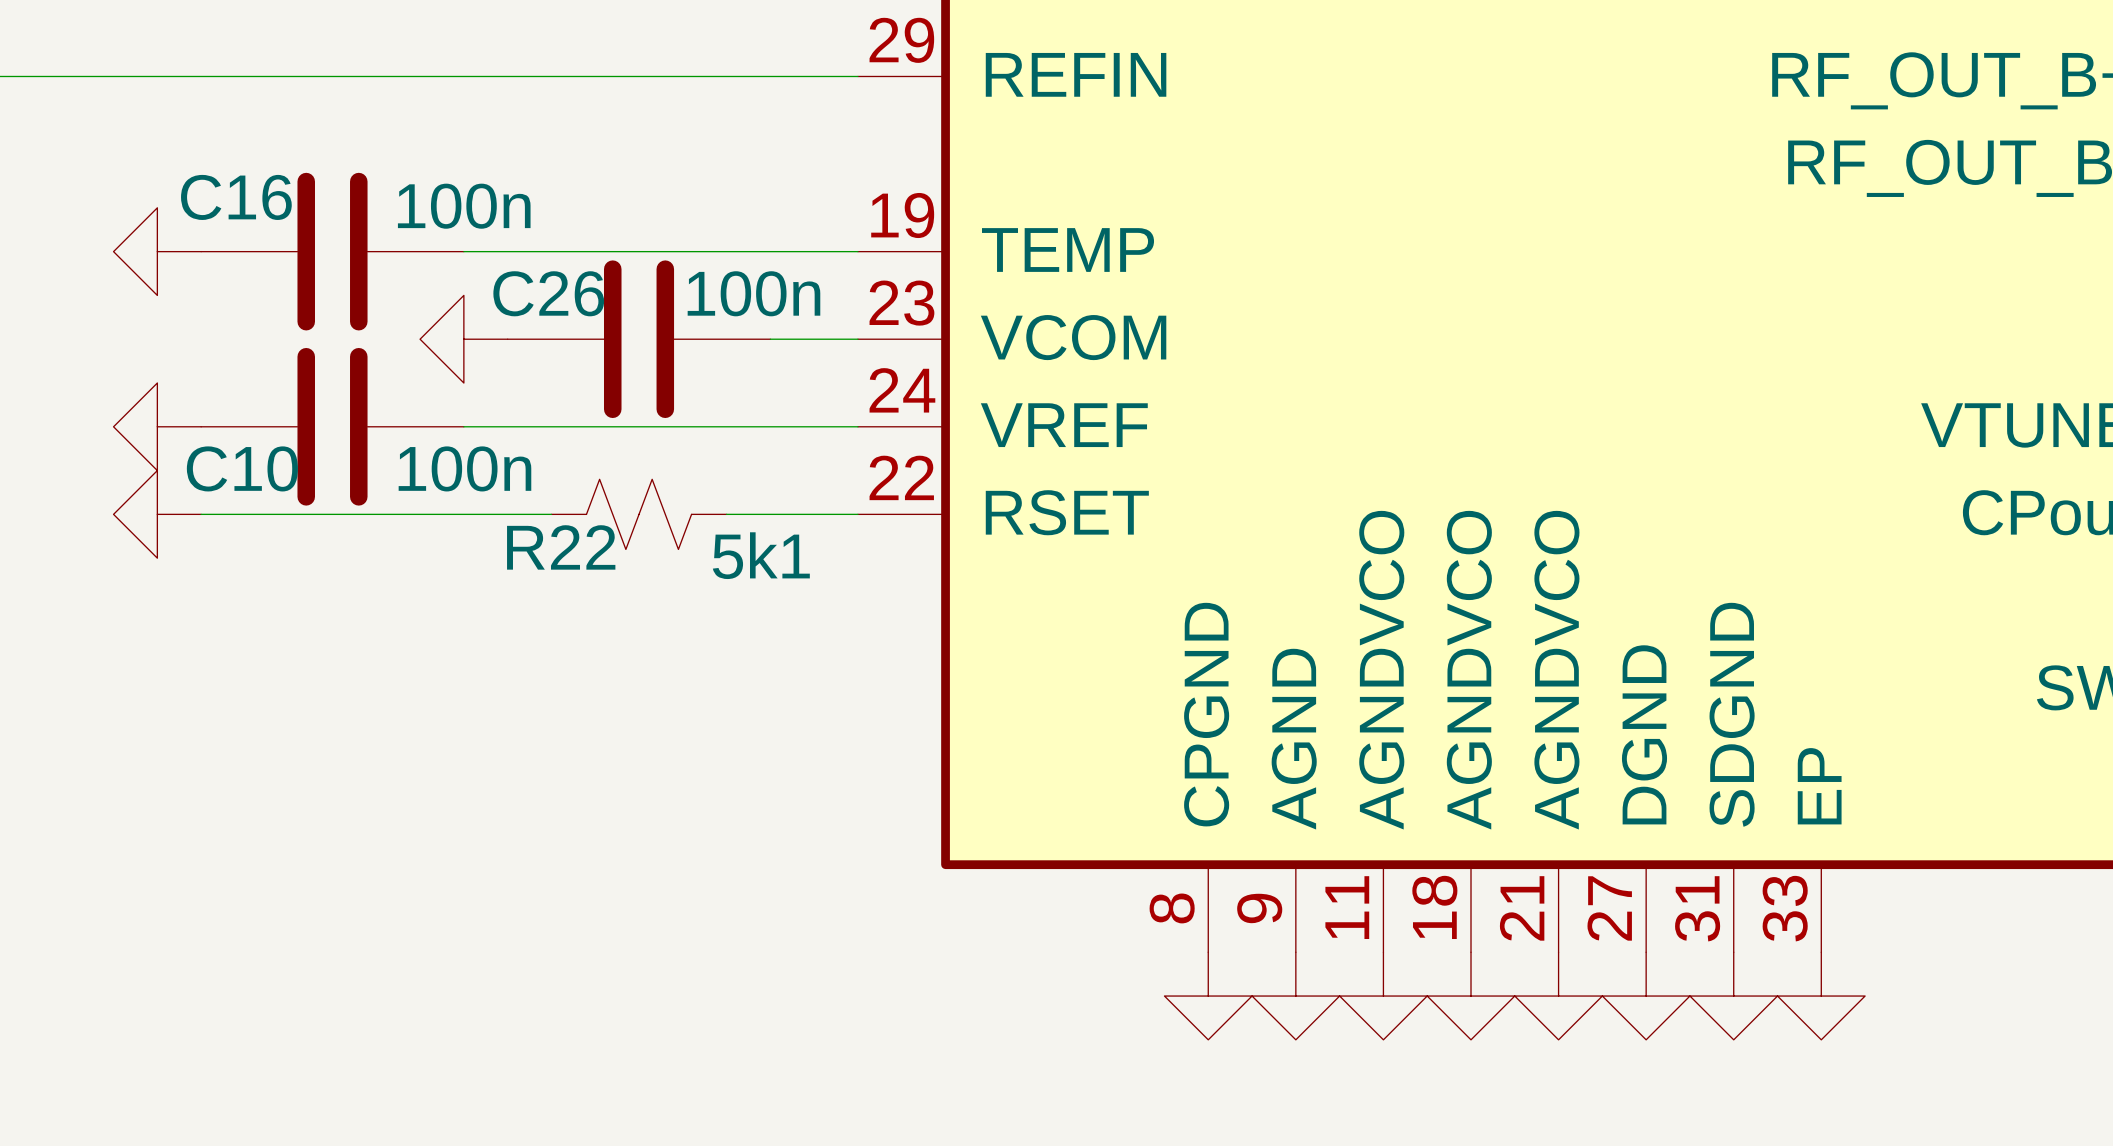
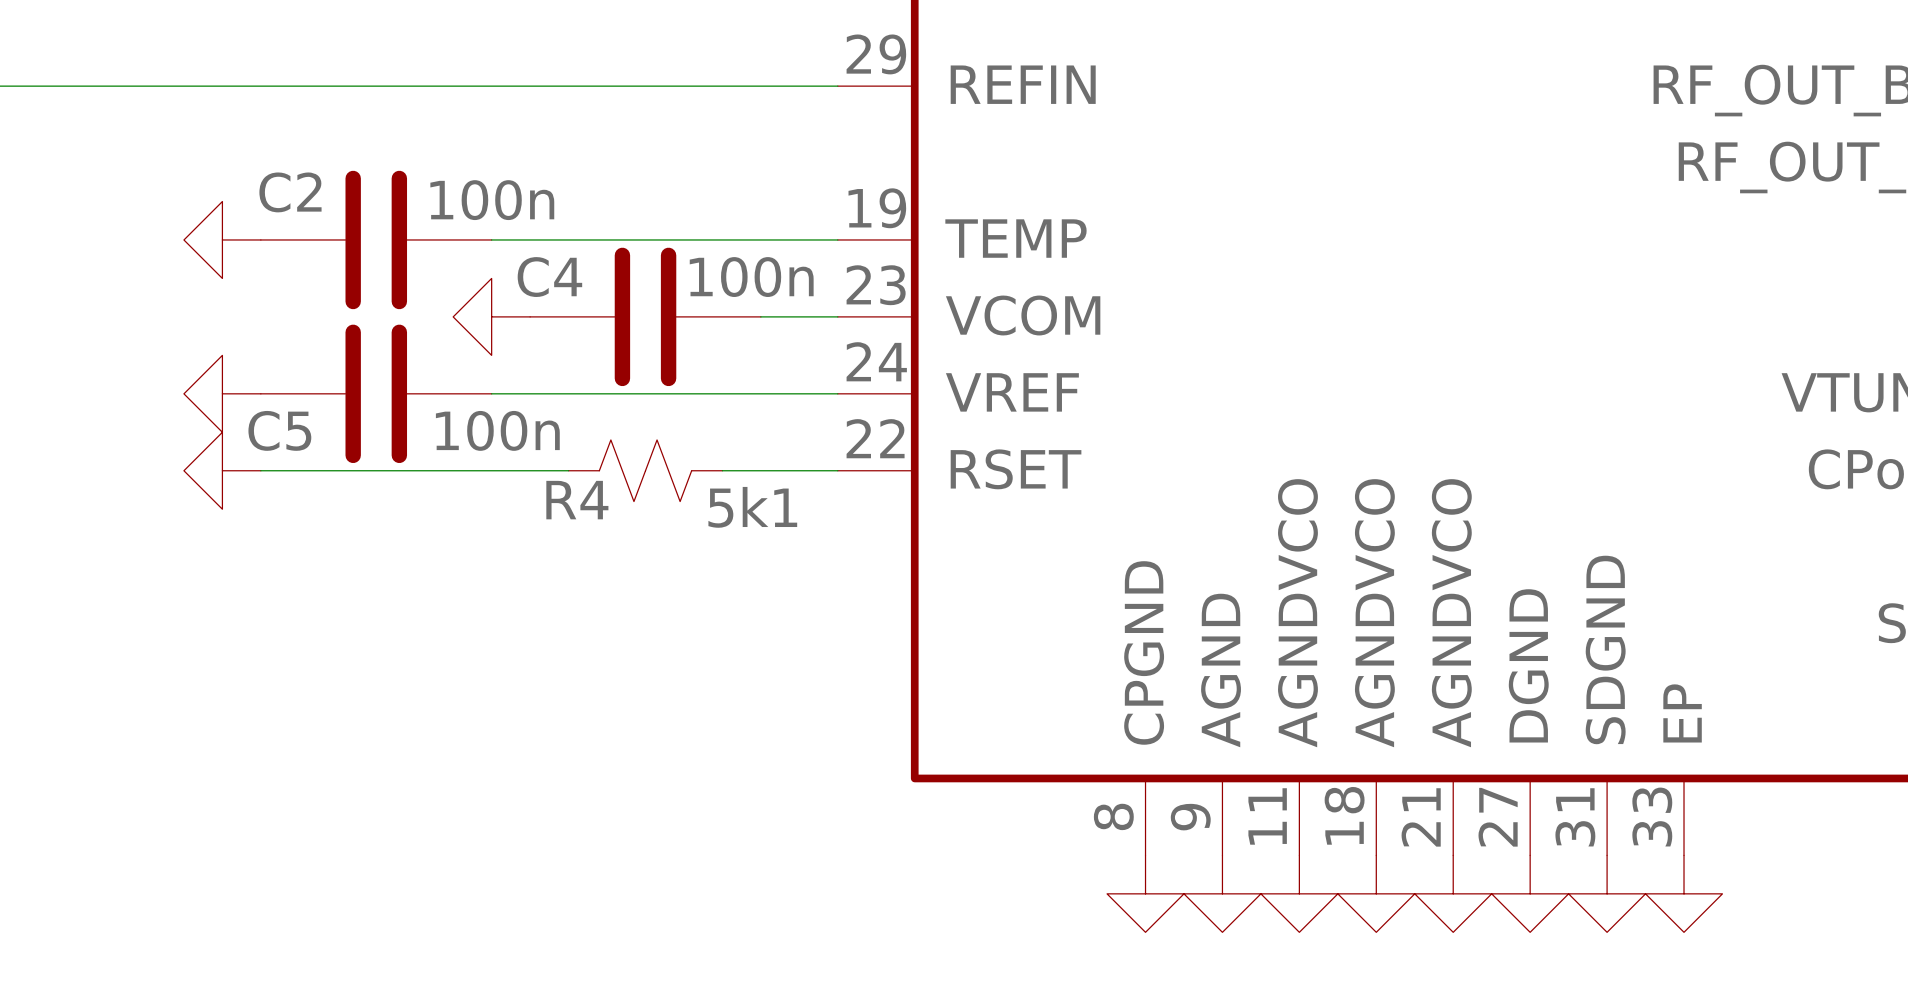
C16 name: C16 (236, 197) -> C2 (290, 192)
C26 name: C26 (548, 293) -> C4 (549, 277)
C10 name: C10 (242, 468) -> C5 (279, 430)
R22 name: R22 (561, 547) -> R4 (577, 500)

